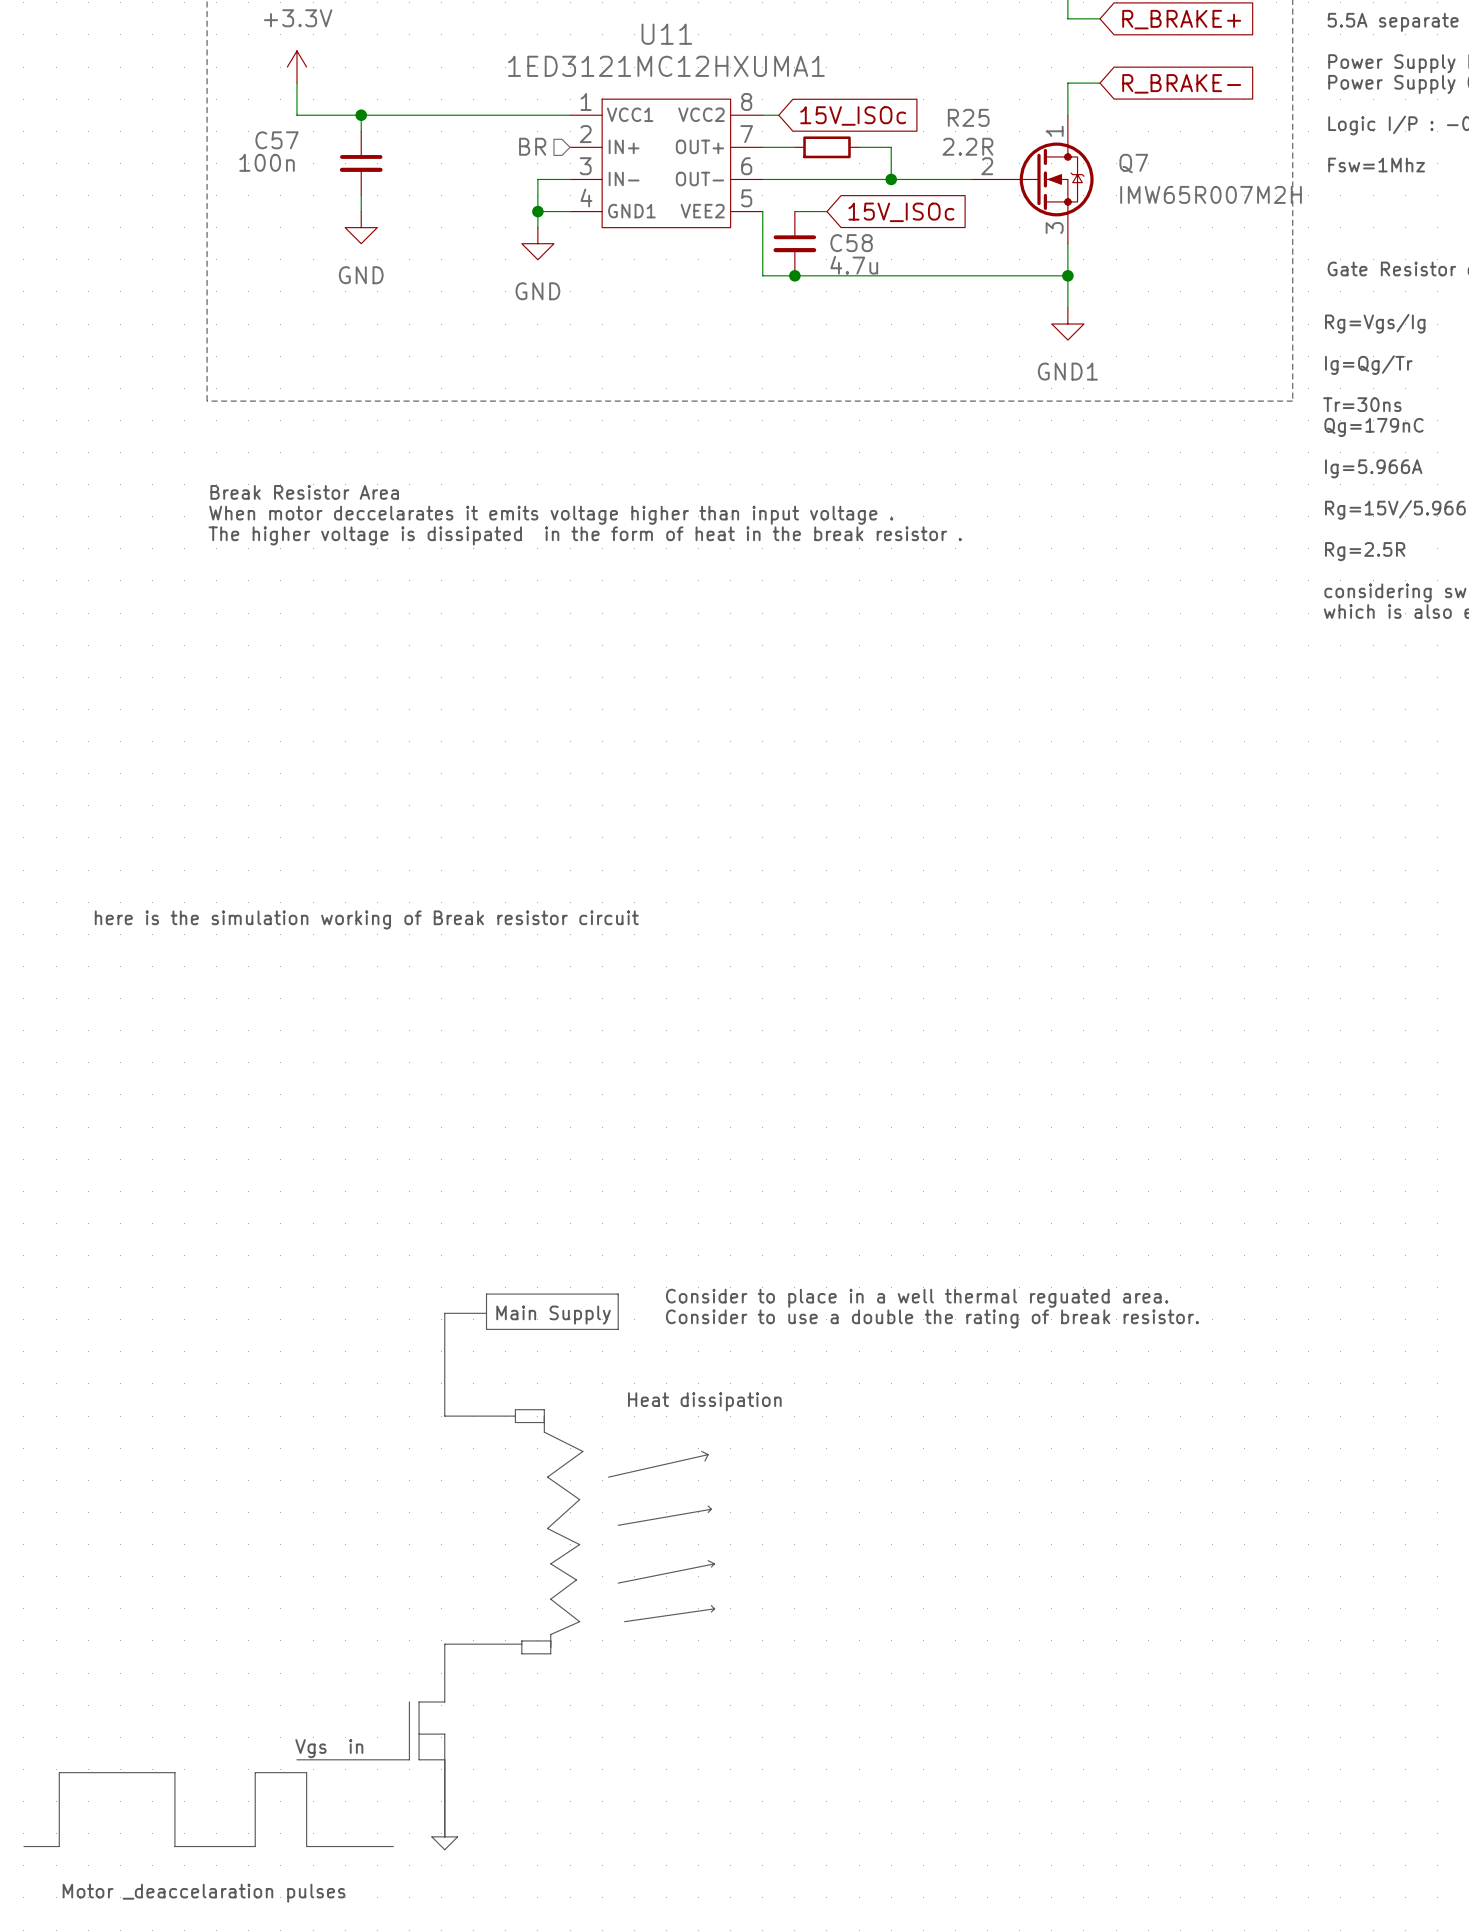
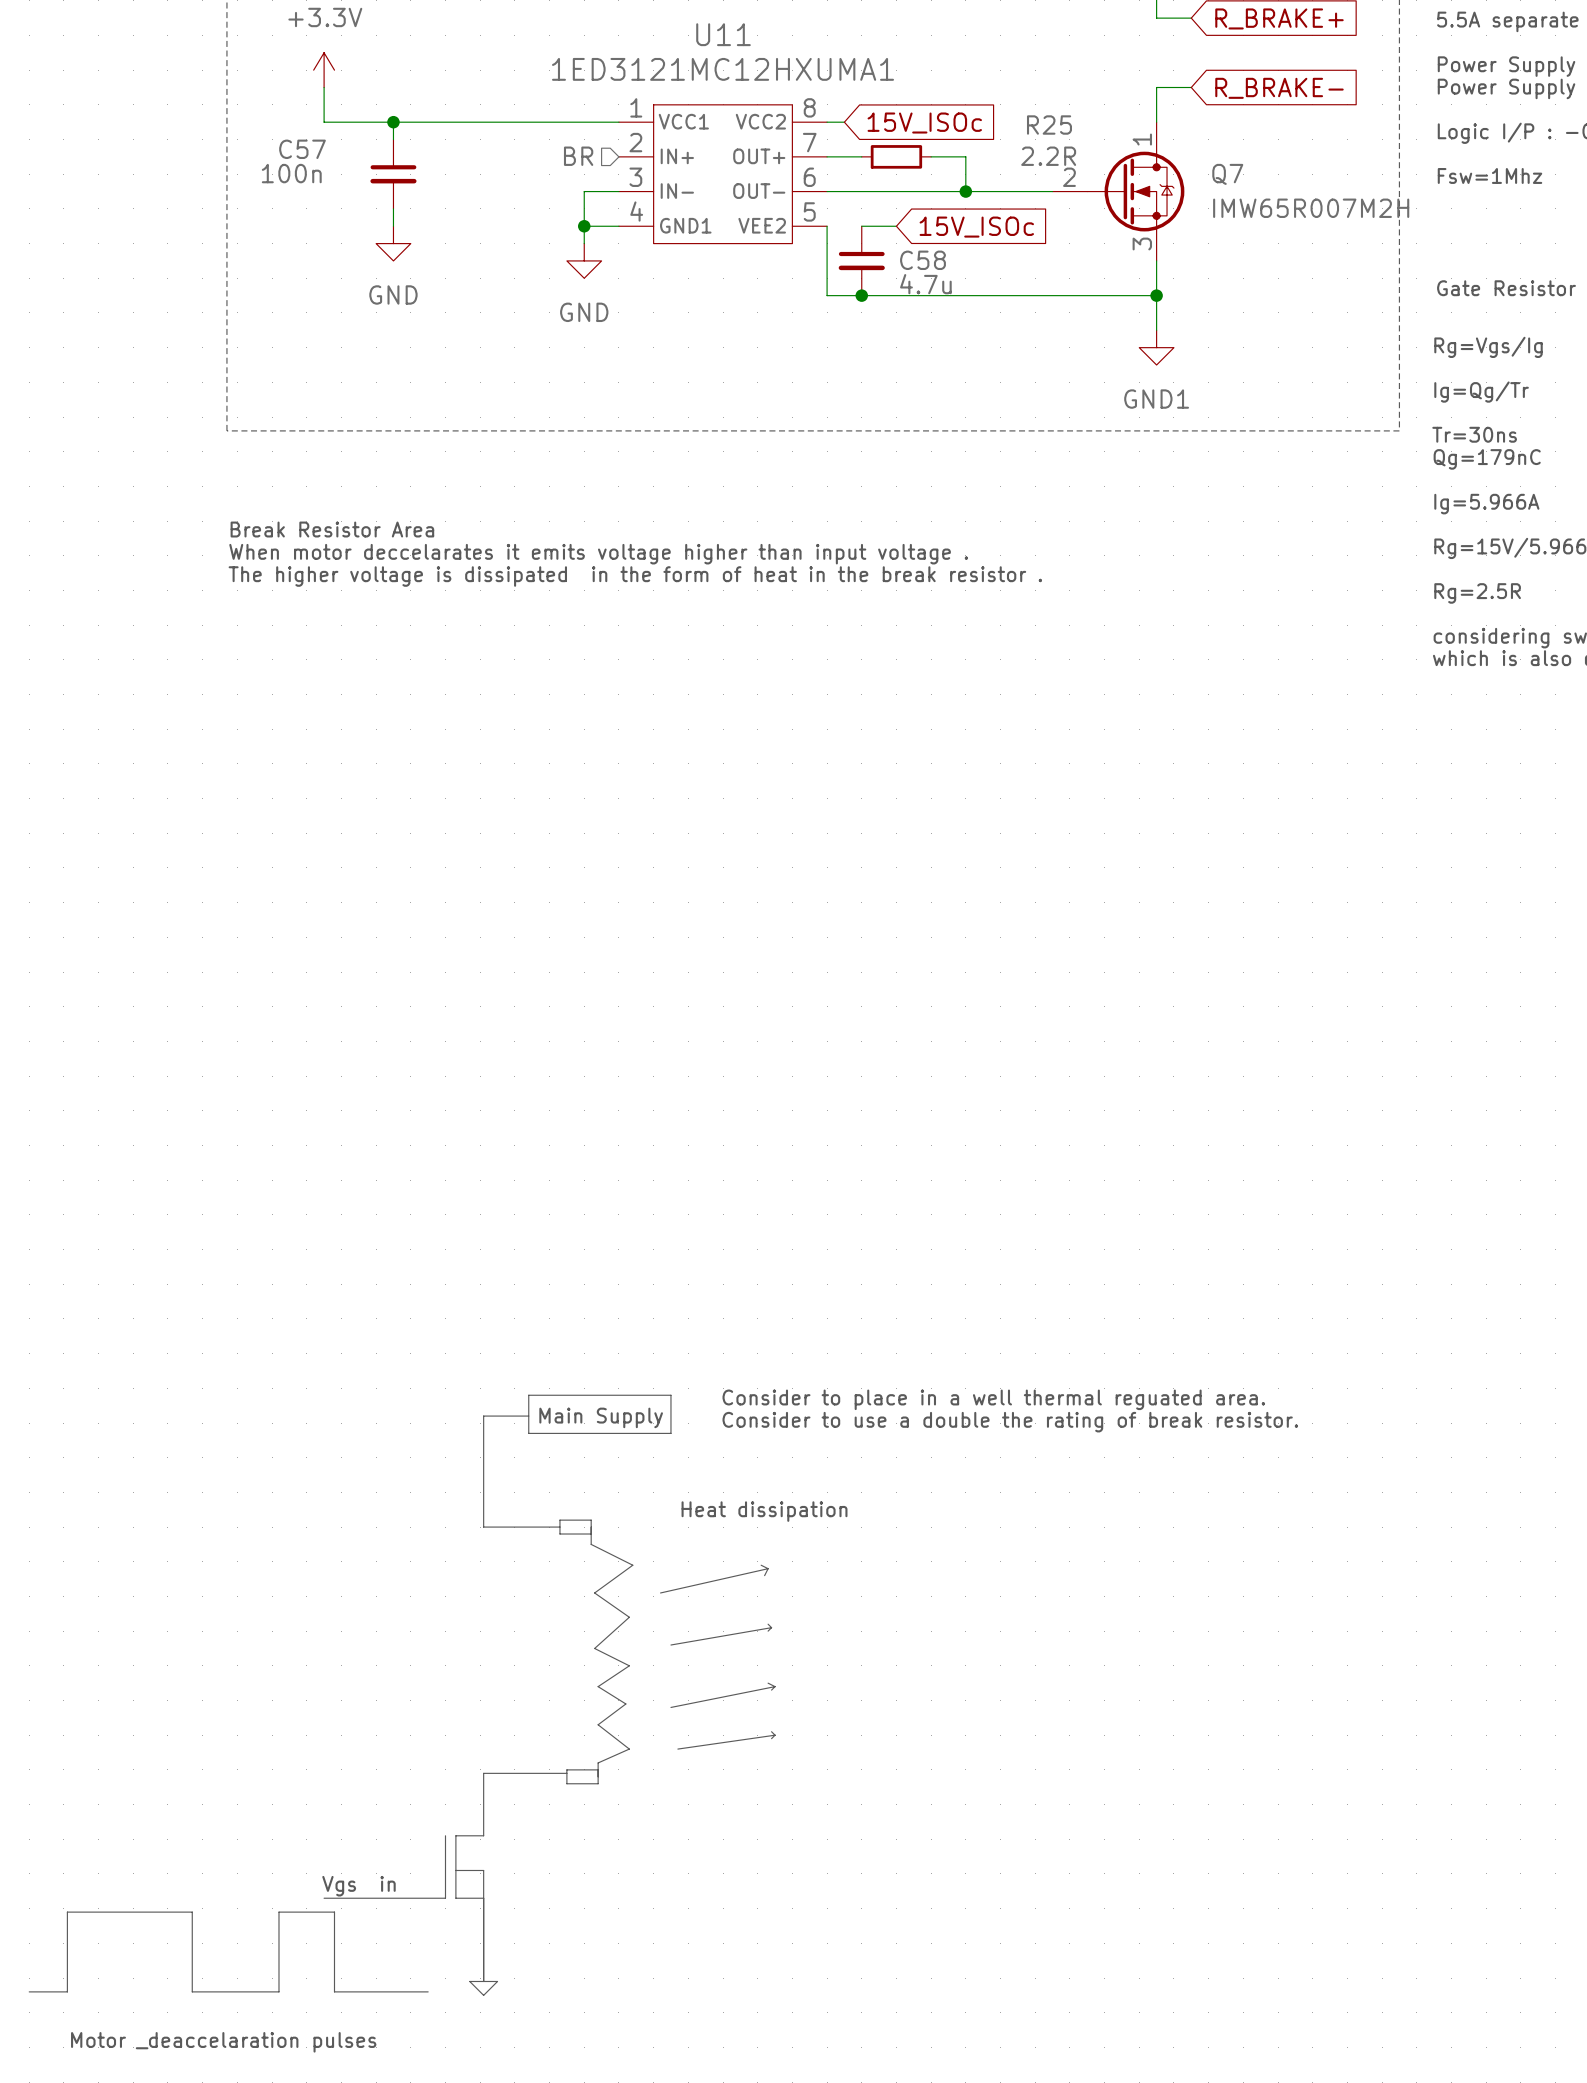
text: here is the simulation working of Break resistor circuit (366, 919) -> none

